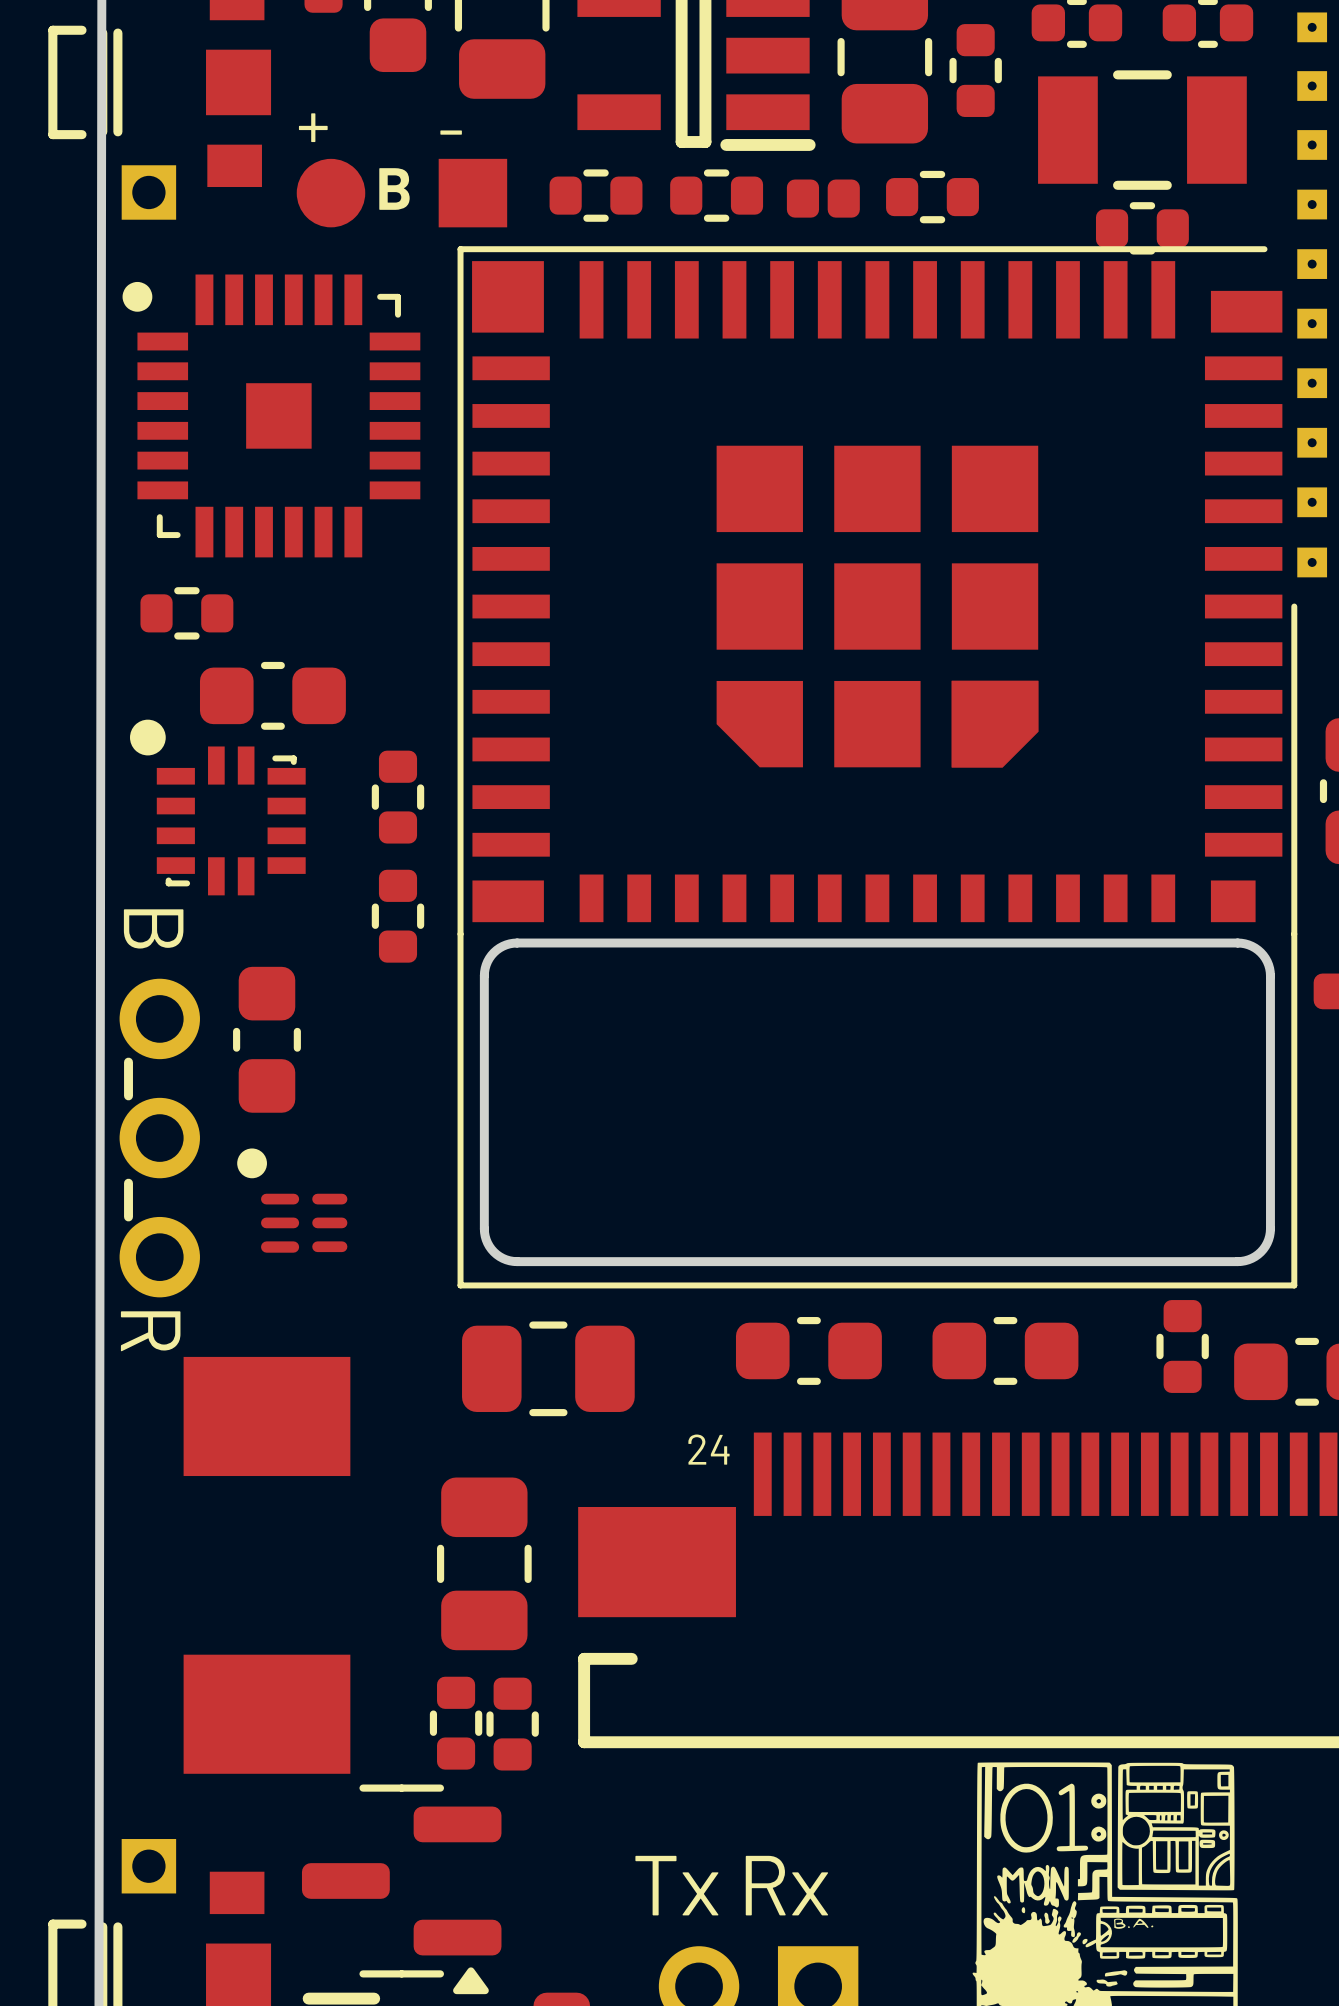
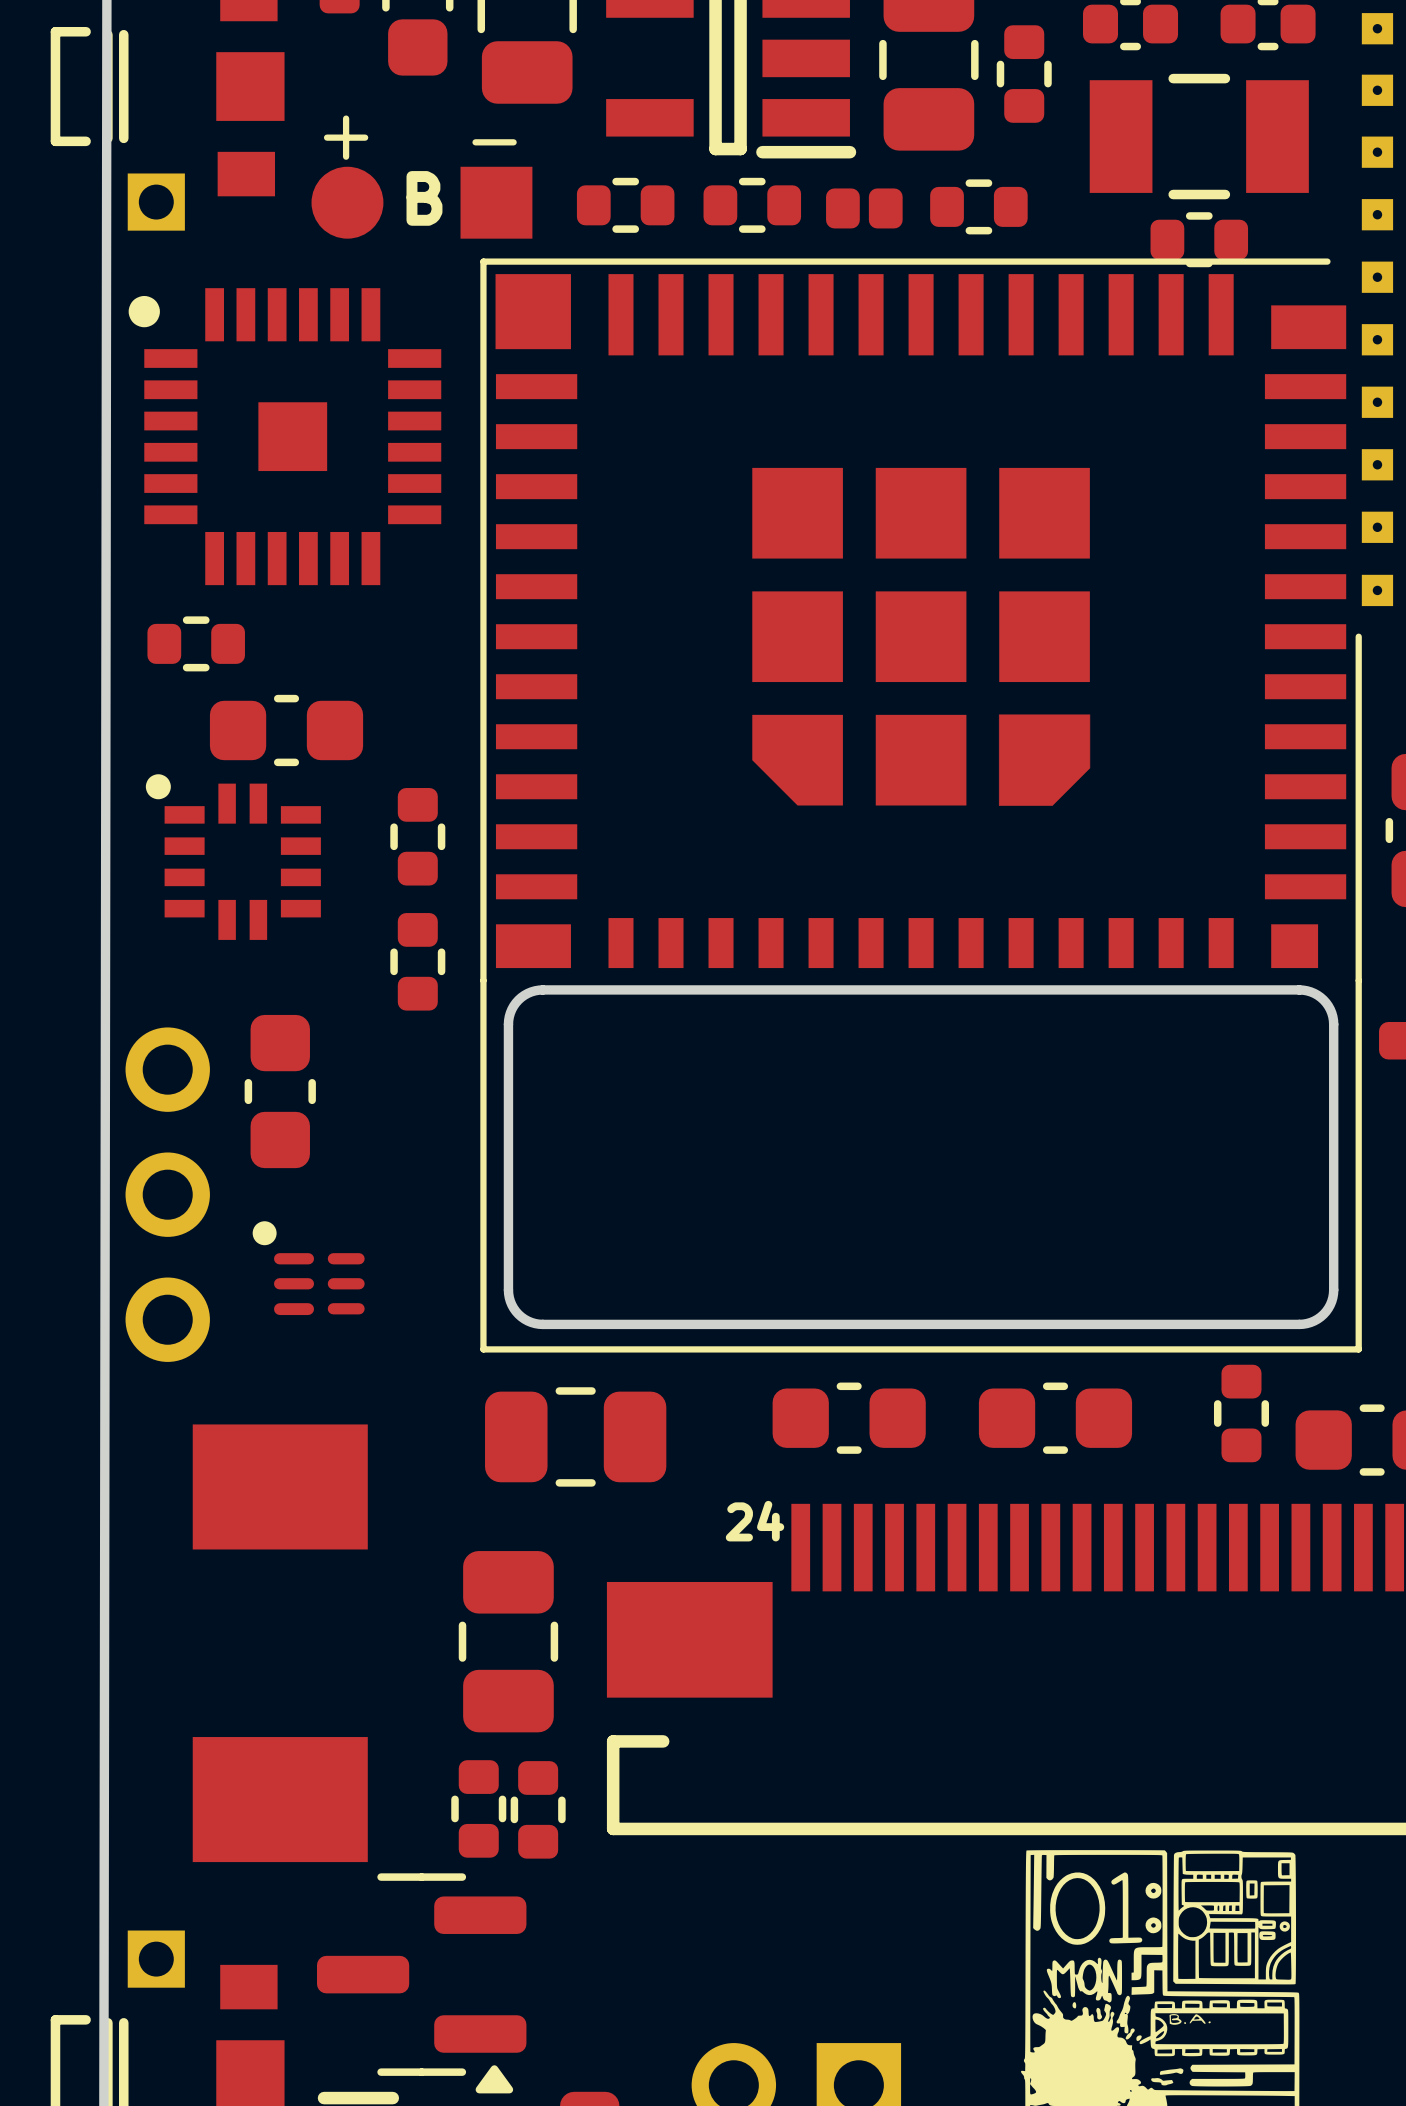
part footprint: [122, 274, 421, 558] -> [128, 288, 442, 586]
part footprint: [130, 719, 306, 896] -> [145, 774, 321, 940]
text: B (153, 928) -> none
line: (128, 1062) (128, 1095) -> none
part footprint: [237, 1148, 348, 1253] -> [252, 1221, 365, 1316]
line: (128, 1183) (128, 1216) -> none
text: R (150, 1331) -> none
text: Tx Rx (731, 1885) -> none

